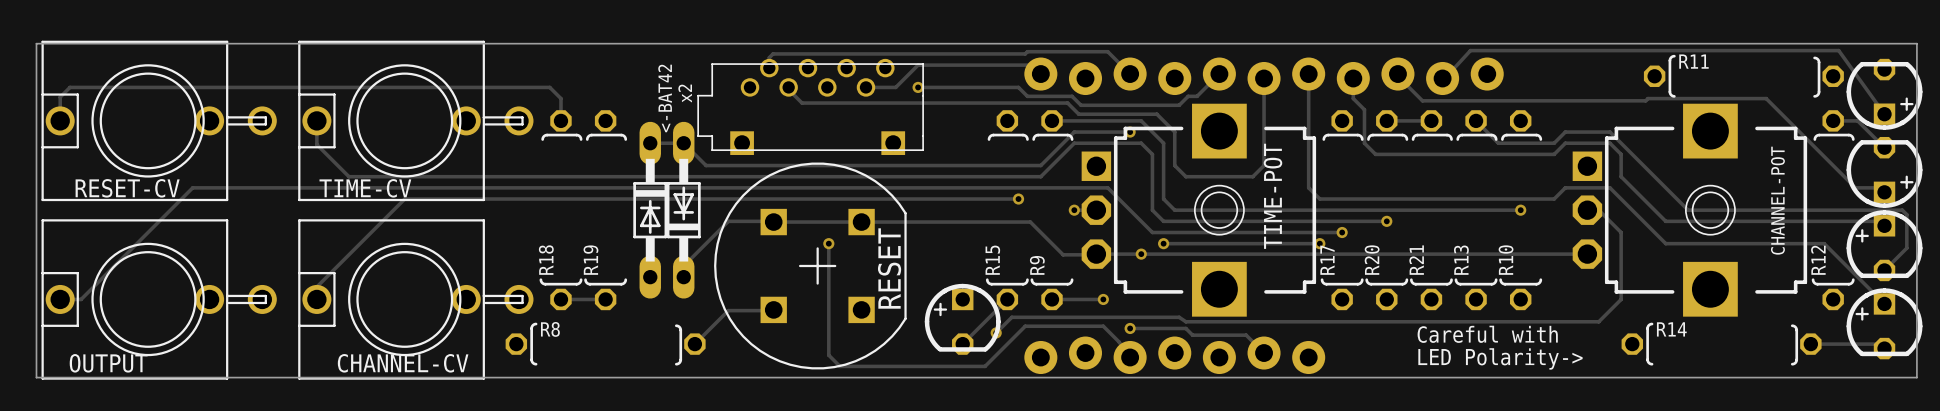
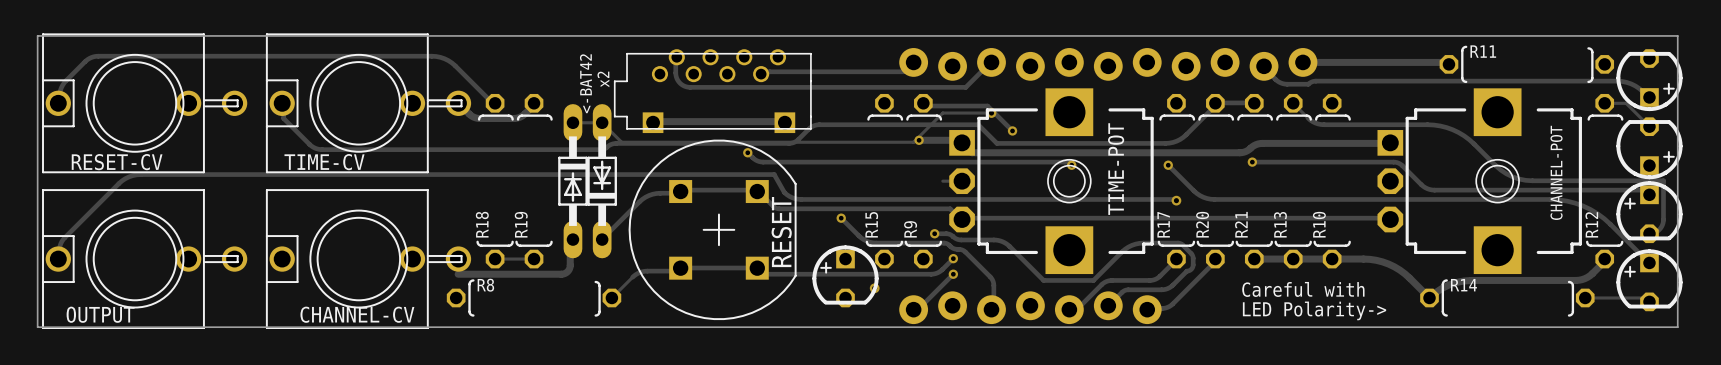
track: (769, 68) (769, 57) (773, 53) (1025, 53) (1027, 51) (1107, 51) (1130, 74) -> (676, 57) (676, 78) (681, 84) (690, 87) (965, 87) (991, 62)
track: (1040, 74) (1031, 65) (918, 65) (895, 87) (865, 87) -> (913, 62) (903, 71) (769, 71) (761, 74)
track: (1219, 74) (1197, 96) (1188, 96) (1179, 105) (1081, 105) (1072, 96) (1027, 96) (1018, 87) (918, 87) -> none
track: (1308, 74) (1308, 187) (1319, 199) (1554, 199) (1565, 187) (1609, 187) (1665, 243) (1824, 243) (1884, 303) -> (1168, 165) (1196, 193) (1210, 199) (1550, 199) (1567, 201) (1582, 205) (1604, 218) (1649, 262)
track: (1397, 74) (1397, 76) (1422, 100) (1766, 98) (1855, 187) (1880, 187) (1884, 192) -> none
track: none -> (1302, 62) (1448, 62) (1448, 64)
track: (1264, 78) (1264, 165) (1252, 176) (1185, 176) (1174, 165) (1174, 132) (1156, 114) (1078, 114) (1067, 103) (802, 103) (788, 87) -> none
track: (1353, 78) (1353, 98) (1364, 109) (1364, 143) (1375, 154) (1554, 154) (1565, 143) (1609, 143) (1621, 154) (1621, 176) (1665, 221) (1880, 221) -> (1252, 162) (1395, 162) (1401, 164) (1423, 186) (1432, 189) (1645, 190)
track: (1442, 78) (1444, 78) (1470, 50) (1838, 50) (1884, 114) -> (1264, 66) (1277, 80) (1285, 84) (1308, 84) (1315, 81) (1617, 81) (1635, 86) (1649, 97)
via: (918, 87) -> none
track: (60, 120) (60, 97) (69, 87) (549, 87) (560, 98) (560, 120) -> (58, 103) (60, 90) (64, 82) (86, 60) (98, 56) (436, 56) (452, 63) (492, 102) (495, 103)
track: (316, 120) (316, 144) (348, 176) (1040, 176) (1074, 143) (1141, 143) (1152, 154) (1152, 210) (1163, 221) (1386, 221) -> (282, 103) (283, 118) (311, 145) (322, 149) (601, 149) (616, 143) (790, 143) (797, 140) (811, 127) (819, 124) (978, 124) (996, 143) (1165, 143) (1183, 137) (1214, 106) (1215, 103) (1254, 103)
track: none -> (458, 103) (471, 115) (480, 118) (517, 117) (525, 113) (534, 103)
track: (1052, 120) (1141, 120) (1163, 143) (1163, 199) (1174, 210) (1520, 210) -> (923, 103) (925, 106) (987, 106) (1012, 130)
track: (1492, 137) (1498, 143) (1554, 143) (1565, 132) (1609, 132) (1688, 210) (1902, 210) (1906, 214) (1906, 248) (1884, 270) -> (1307, 118) (1321, 124) (1427, 124) (1446, 127) (1469, 139) (1506, 173) (1525, 180) (1663, 180) (1663, 223) (1658, 230) (1649, 233)
track: none -> (653, 122) (784, 122)
via: none -> (1012, 130)
track: none -> (919, 140) (959, 140) (972, 152) (1239, 152) (1260, 143) (1390, 142)
via: none -> (919, 140)
track: none -> (747, 152) (755, 160) (763, 162) (1068, 162) (1071, 165)
via: none -> (747, 152)
via: none -> (1252, 162)
via: none -> (1071, 165)
via: none -> (1168, 165)
track: (1018, 199) (404, 199) (316, 286) (316, 299) -> none
via: (1018, 199) -> none
via: (1074, 210) -> none
via: (1520, 210) -> none
track: (1587, 210) (1598, 210) (1621, 232) (1621, 299) (1598, 321) (1185, 321) (1179, 317) (1011, 317) (996, 332) -> none
via: (1386, 221) -> none
track: (1342, 232) (1152, 232) (1107, 187) (192, 187) (81, 299) (60, 299) -> (1177, 199) (801, 199) (792, 197) (784, 192) (774, 174) (140, 174) (128, 176) (121, 180) (64, 237) (60, 245) (58, 259)
track: (828, 243) (828, 355) (839, 366) (985, 366) (1025, 326) (1103, 326) (1118, 341) (1130, 357) -> (841, 218) (861, 238) (869, 242) (944, 243) (953, 248) (963, 250) (992, 280) (993, 308) (991, 309)
via: (828, 243) -> none
track: (1163, 243) (1319, 243) -> none
via: (1163, 243) -> none
via: (1319, 243) -> none
via: none -> (841, 218)
via: (1141, 254) -> none
track: (1587, 254) (1063, 254) (1030, 222) (728, 221) (683, 265) (683, 277) -> (1390, 219) (962, 219) (950, 208) (778, 208) (757, 190) (682, 190) (679, 193) (656, 193) (645, 197) (602, 239)
track: none -> (934, 233) (947, 233) (952, 236)
via: none -> (934, 233)
track: none -> (572, 239) (570, 239) (569, 267) (563, 273) (458, 274)
track: (1007, 299) (962, 344) -> none
track: (1052, 299) (1103, 299) -> none
via: none -> (953, 258)
via: (1103, 299) -> none
track: none -> (1176, 259) (1160, 276) (1153, 279) (1106, 281) (1077, 308) (1069, 309)
track: none -> (1215, 259) (1214, 261) (1171, 305) (1163, 308) (1147, 309)
track: none -> (1254, 259) (1376, 260) (1399, 270) (1429, 297) (1441, 288) (1463, 280) (1581, 279) (1592, 273) (1604, 259)
track: (773, 309) (728, 310) (718, 320) -> (953, 258) (940, 270) (931, 274) (763, 274) (757, 268) (682, 268) (679, 271) (643, 271) (632, 277)
track: none -> (953, 274) (919, 308) (913, 309)
via: none -> (953, 274)
track: (1130, 328) (1185, 328) (1192, 335) (1246, 335) (1264, 353) -> (953, 236) (960, 239) (996, 240) (1004, 242) (1043, 280) (1093, 280) (1124, 249) (1139, 243) (1179, 243) (1192, 254) (1191, 268) (1169, 287) (1161, 289) (1126, 290) (1108, 305)
via: (1130, 328) -> none

